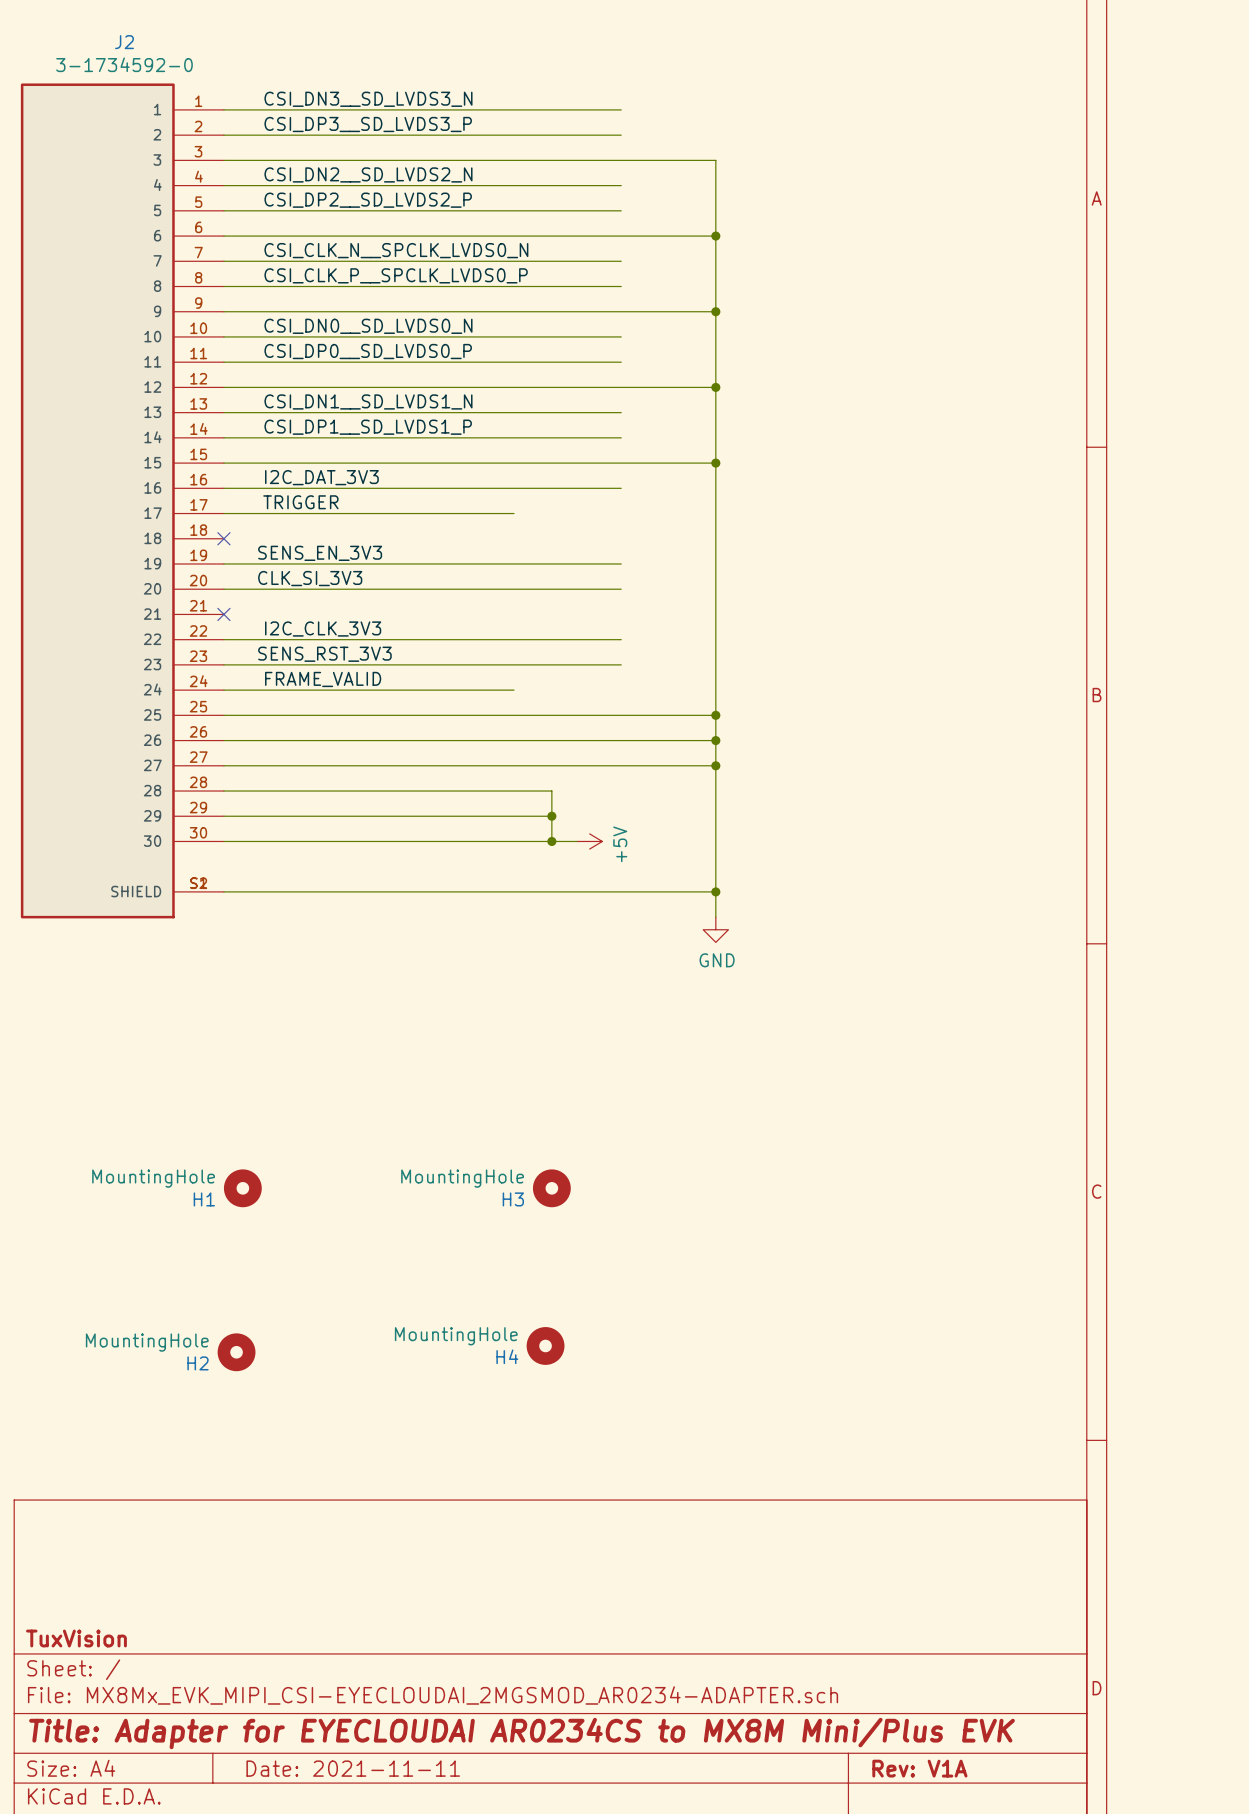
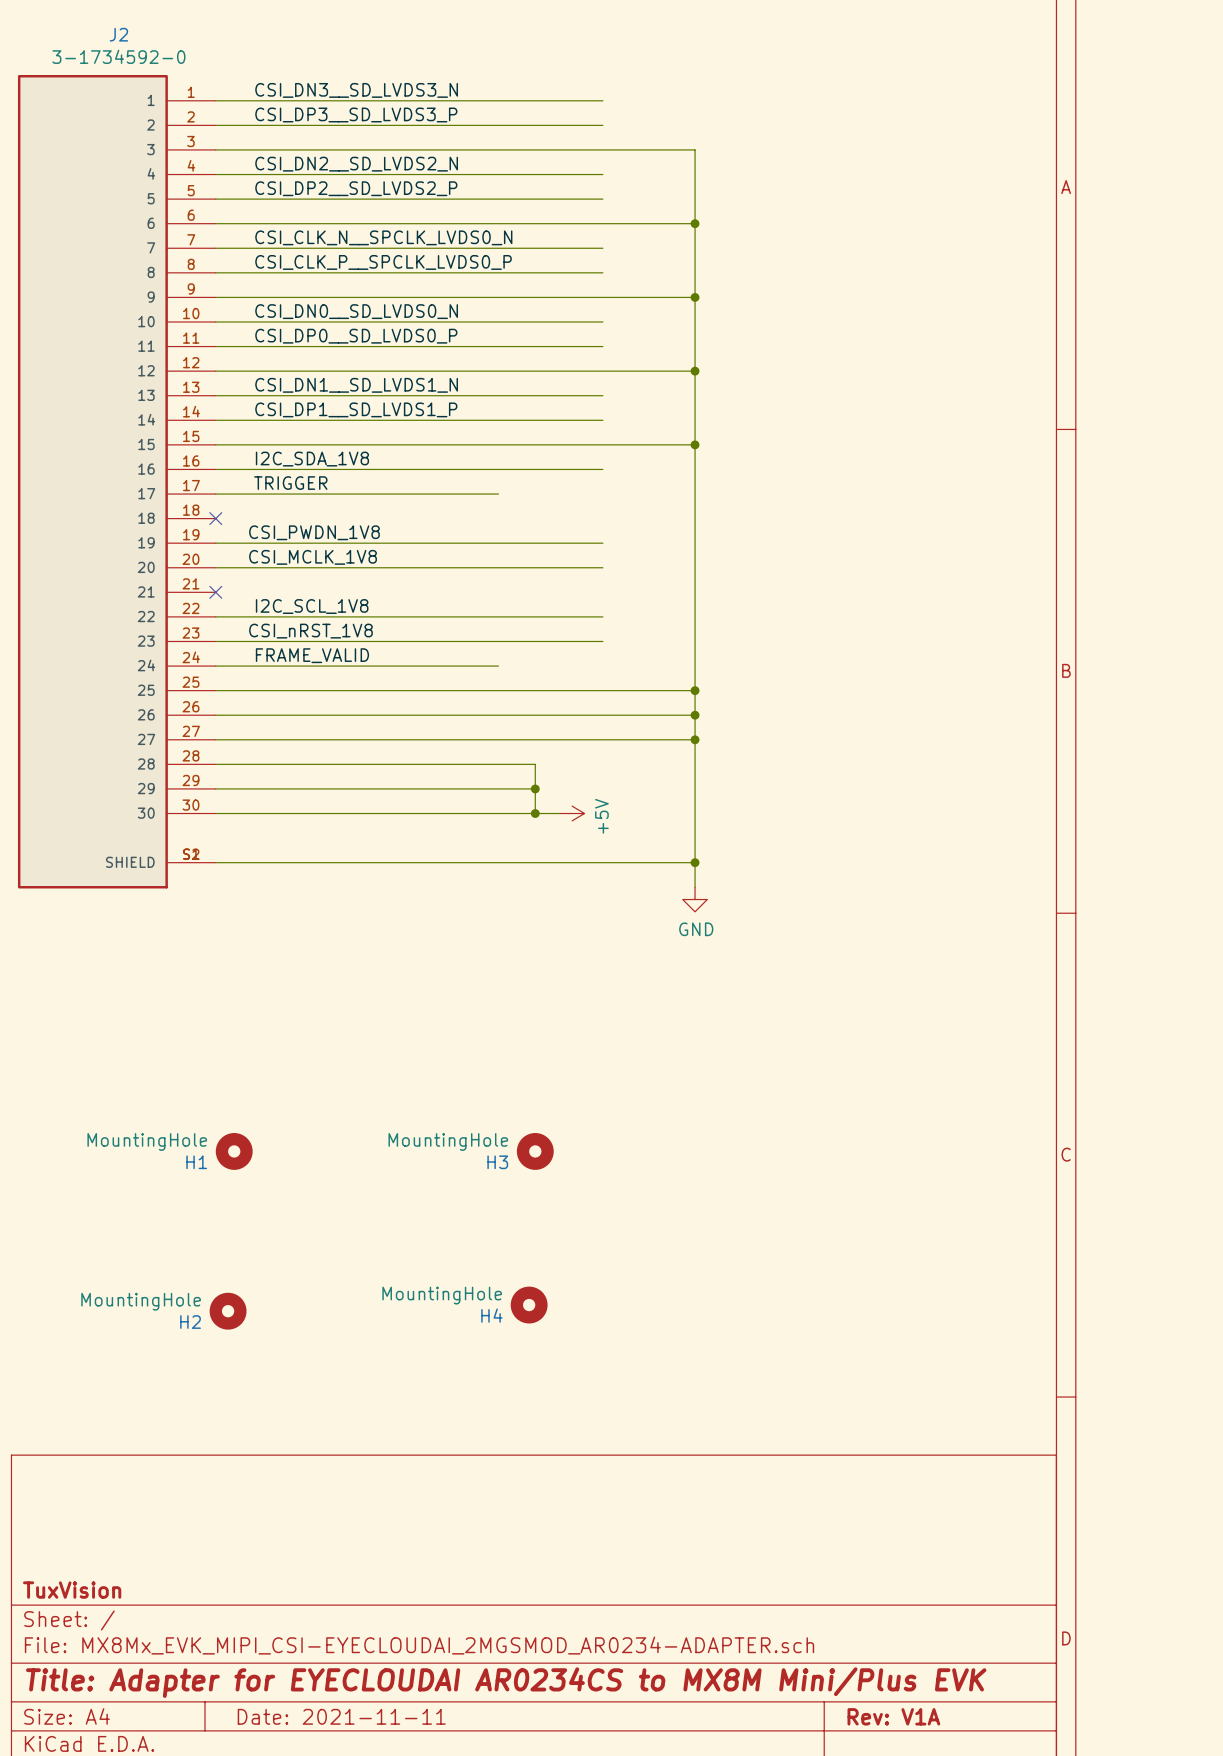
label: I2C_DAT_3V3 (321, 477) -> I2C_SDA_1V8 (312, 459)
label: SENS_EN_3V3 (320, 553) -> CSI_PWDN_1V8 (314, 532)
label: CLK_SI_3V3 (310, 578) -> CSI_MCLK_1V8 (313, 557)
label: I2C_CLK_3V3 (323, 629) -> I2C_SCL_1V8 (312, 606)
label: SENS_RST_3V3 (324, 654) -> CSI_nRST_1V8 (310, 631)

